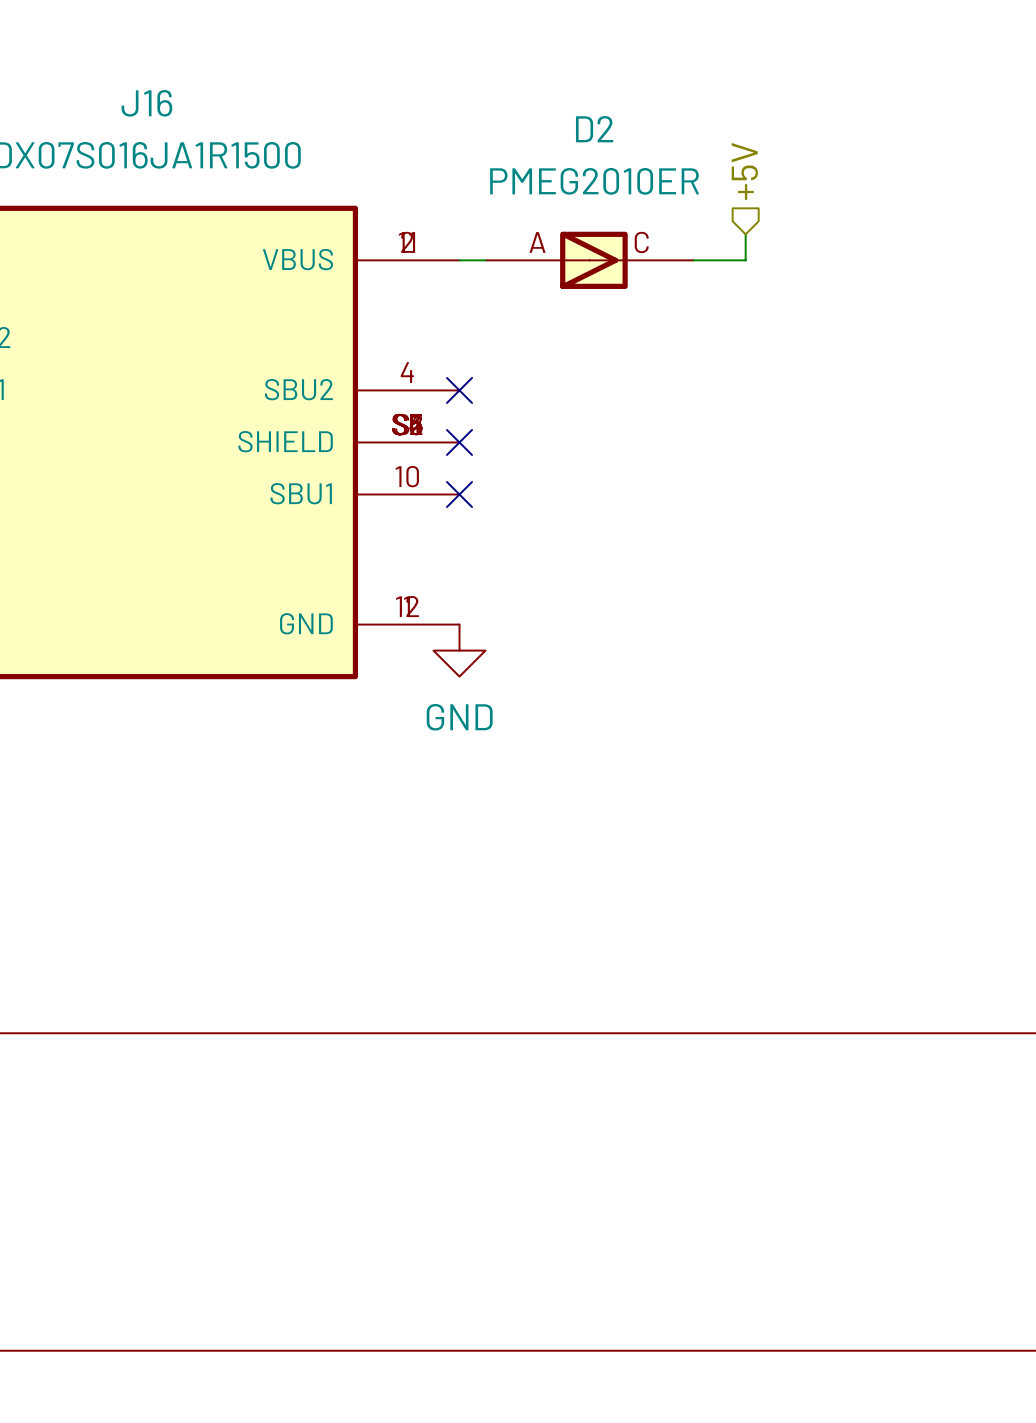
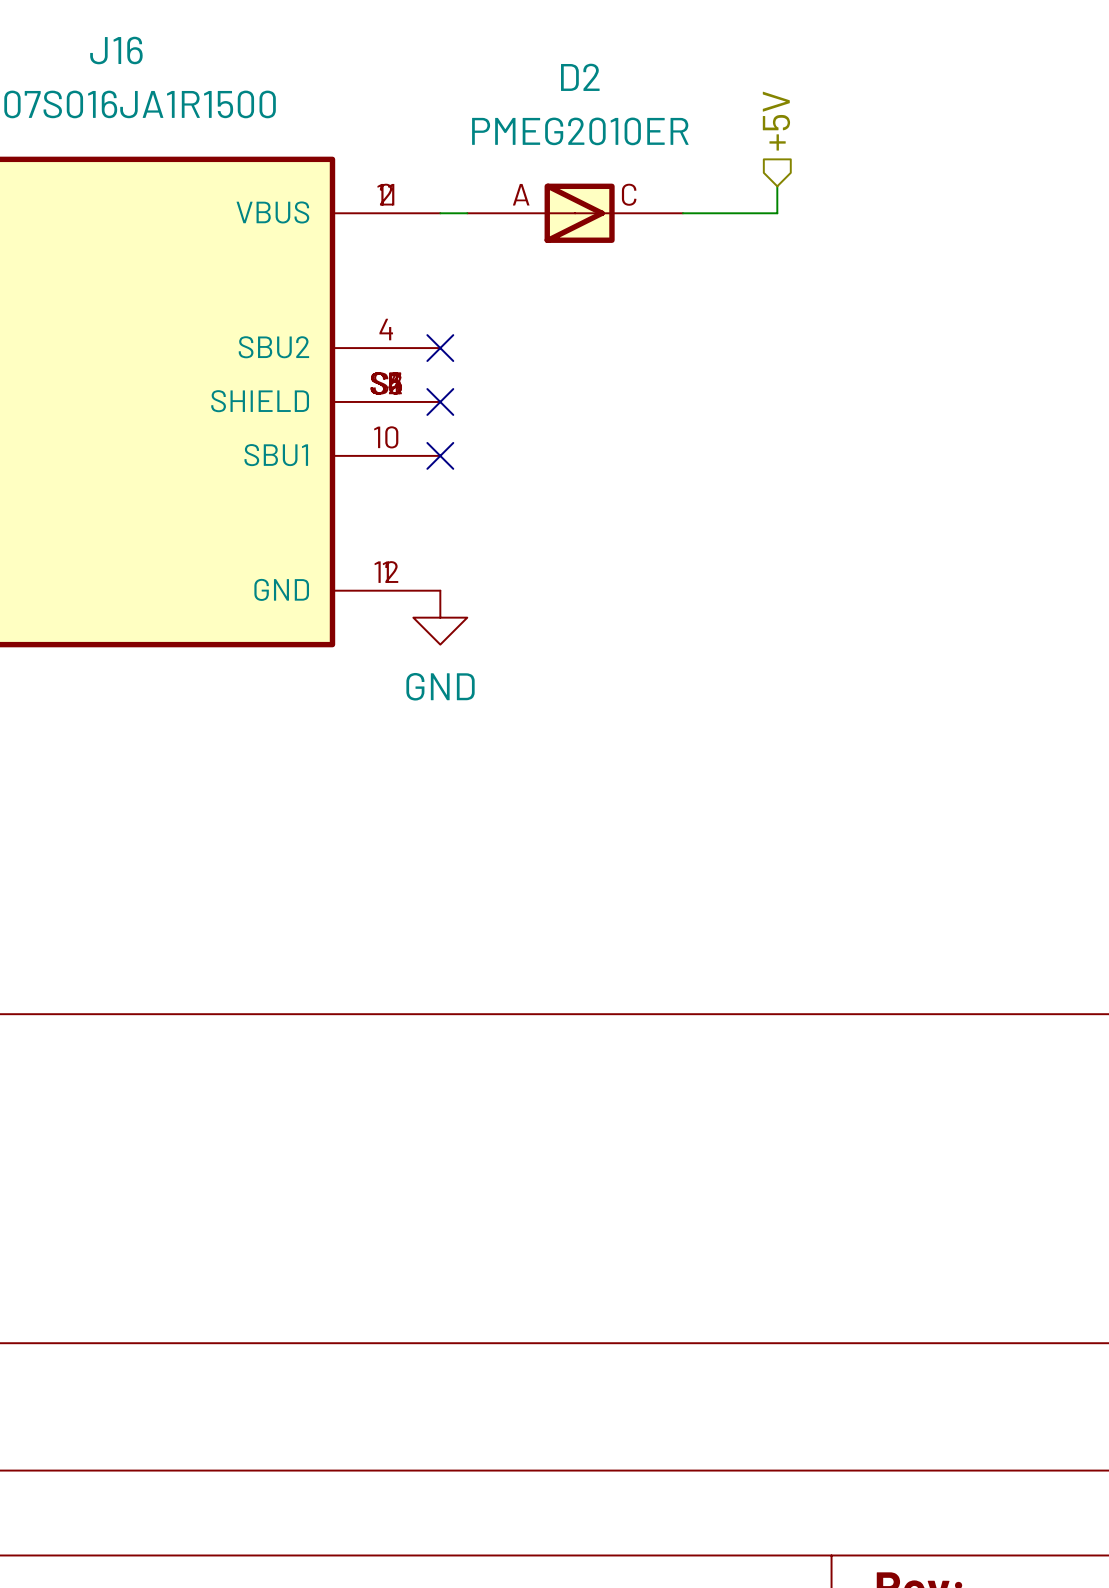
hierarchical label position: +5V (744, 171) -> +5V (776, 121)
wire: (745, 234) (745, 260) -> (777, 186) (777, 213) (736, 213)

